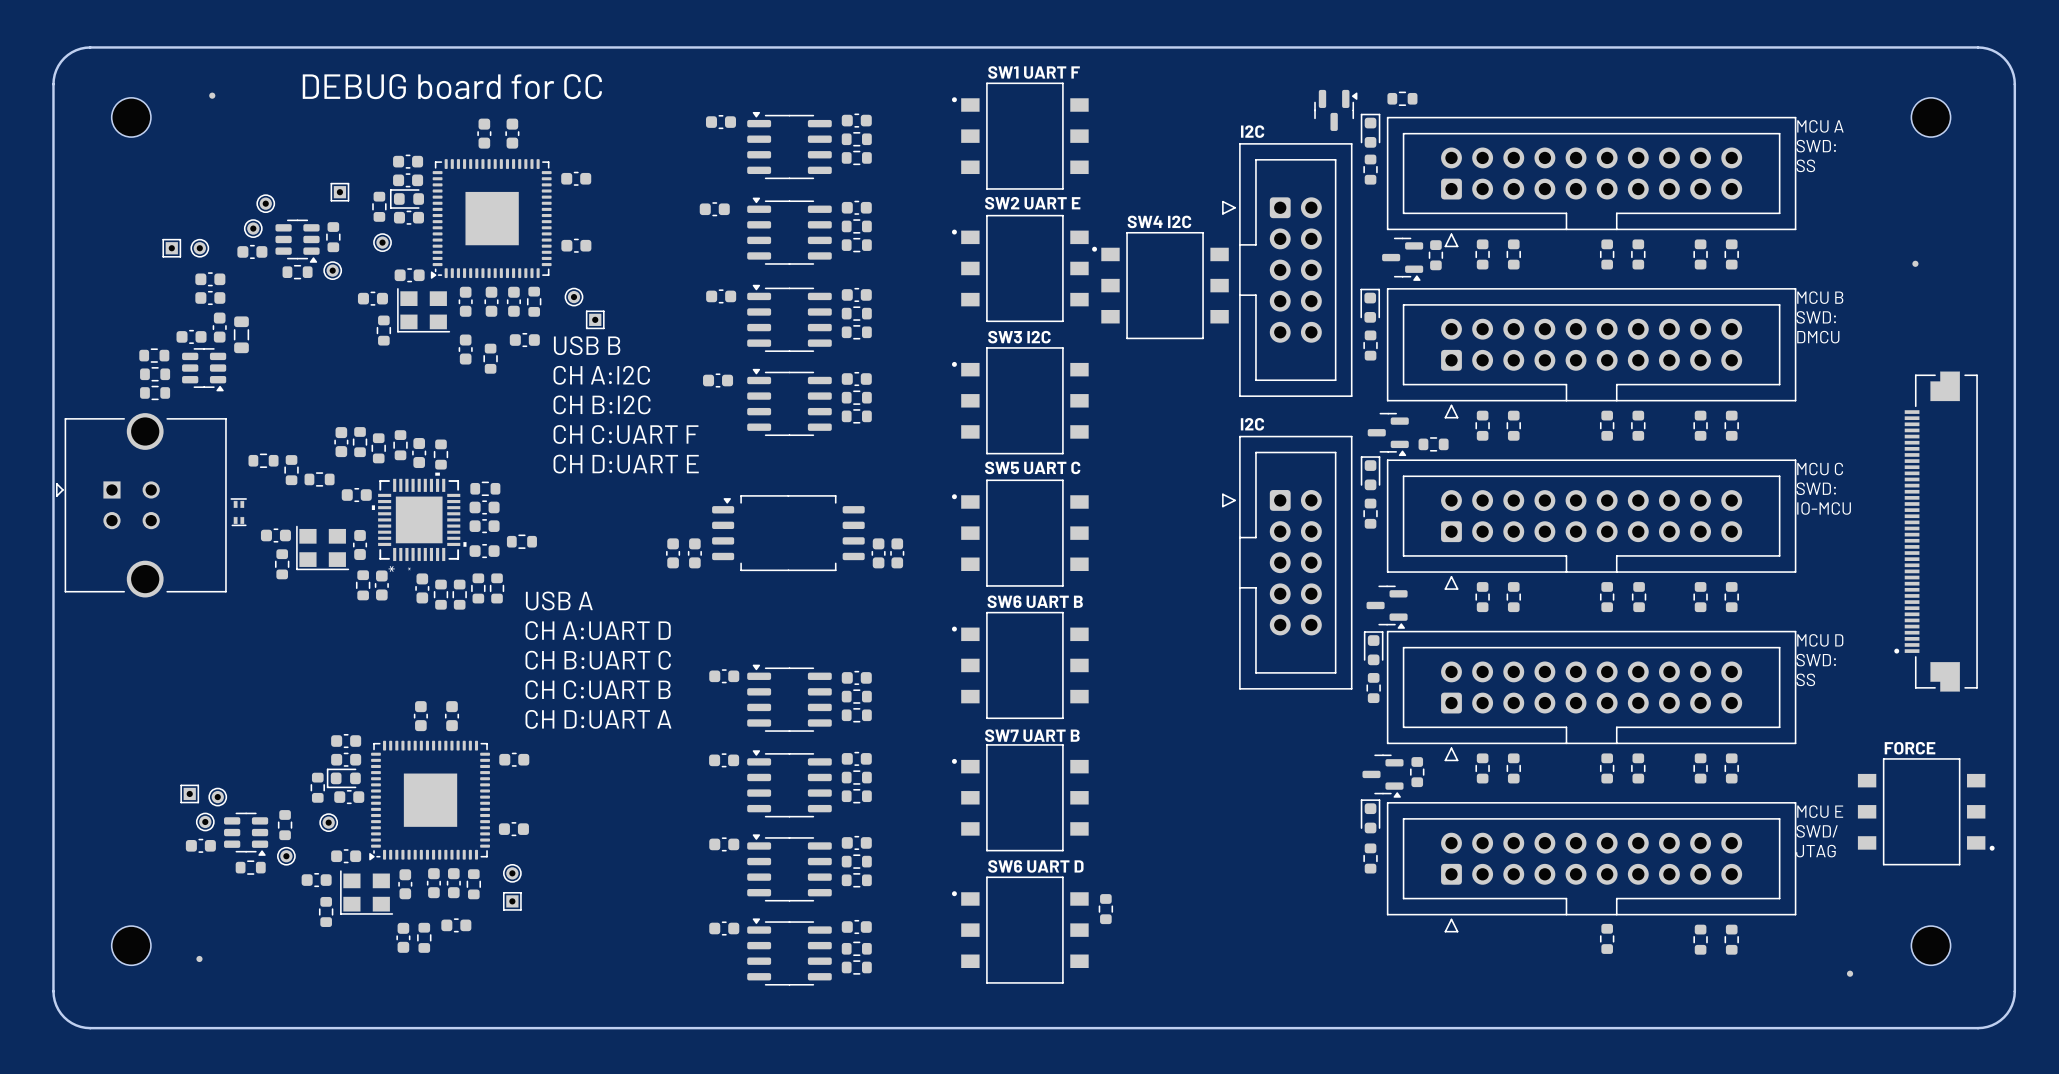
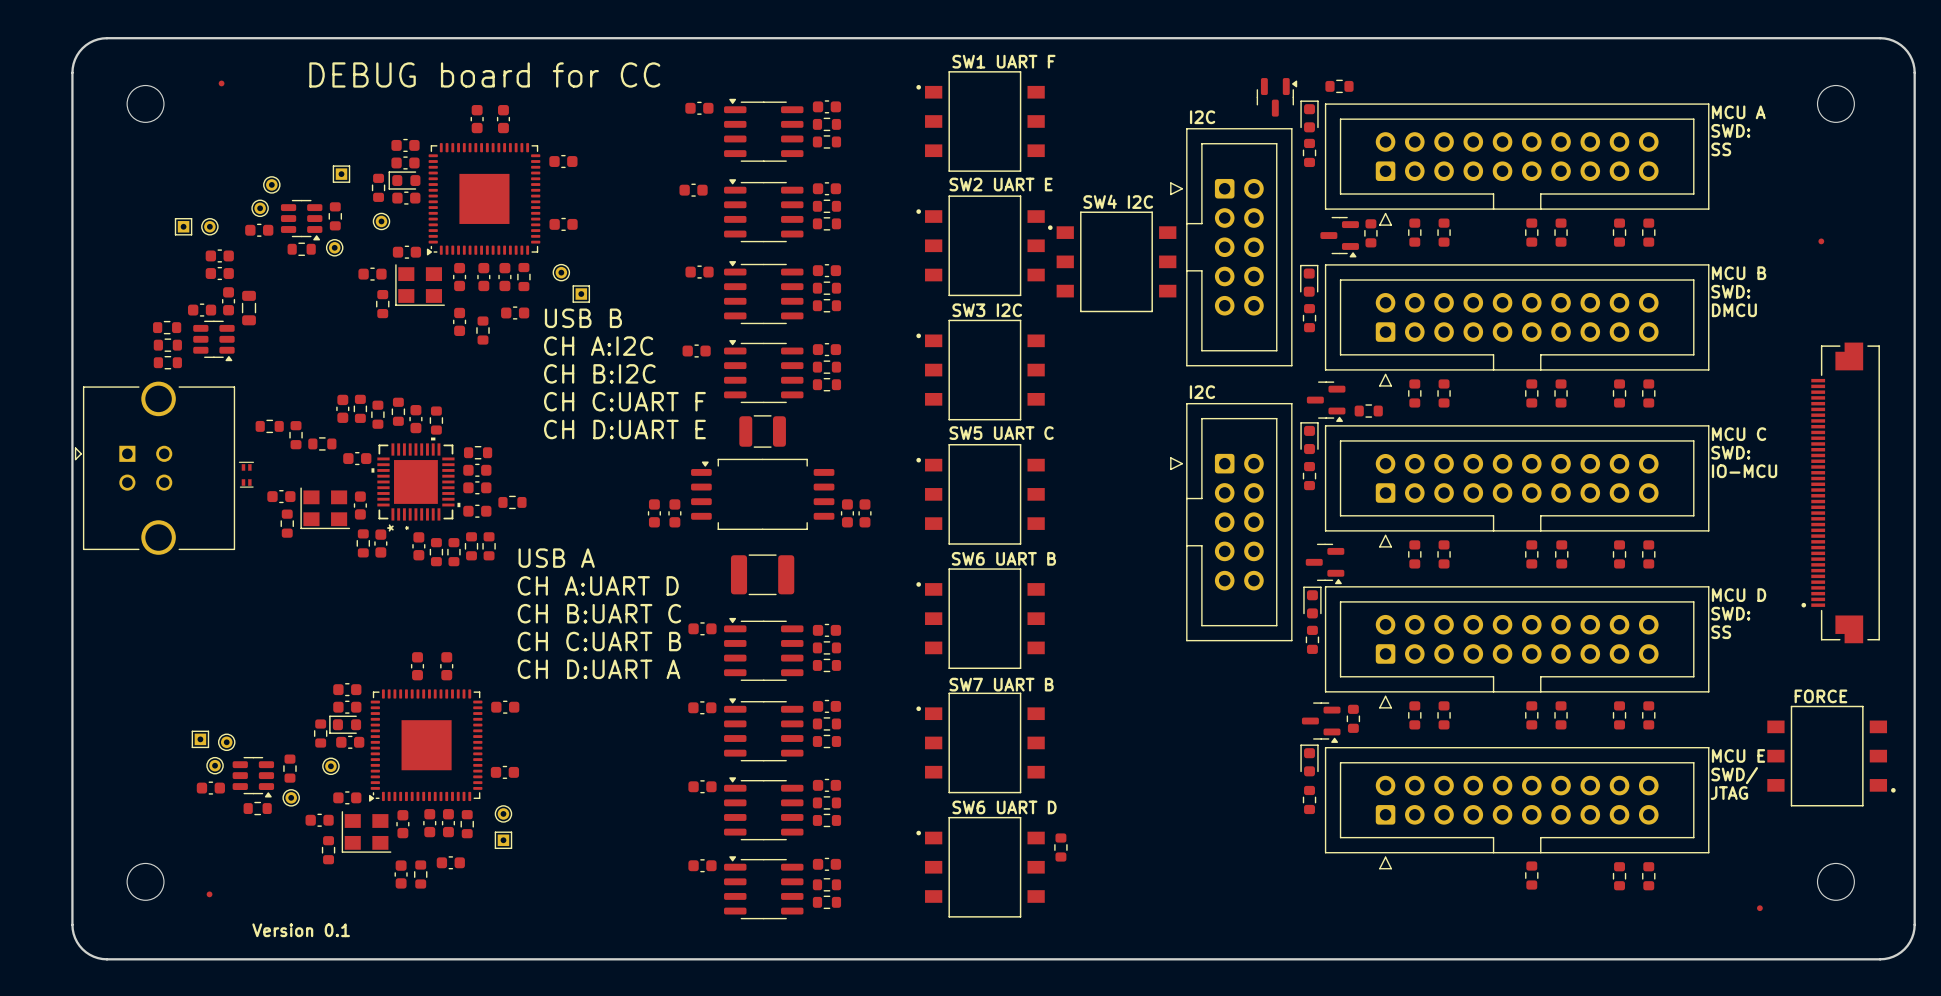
part: none -> (762, 431)
part: none -> (762, 574)
text: none -> Version 0.1 (301, 930)

